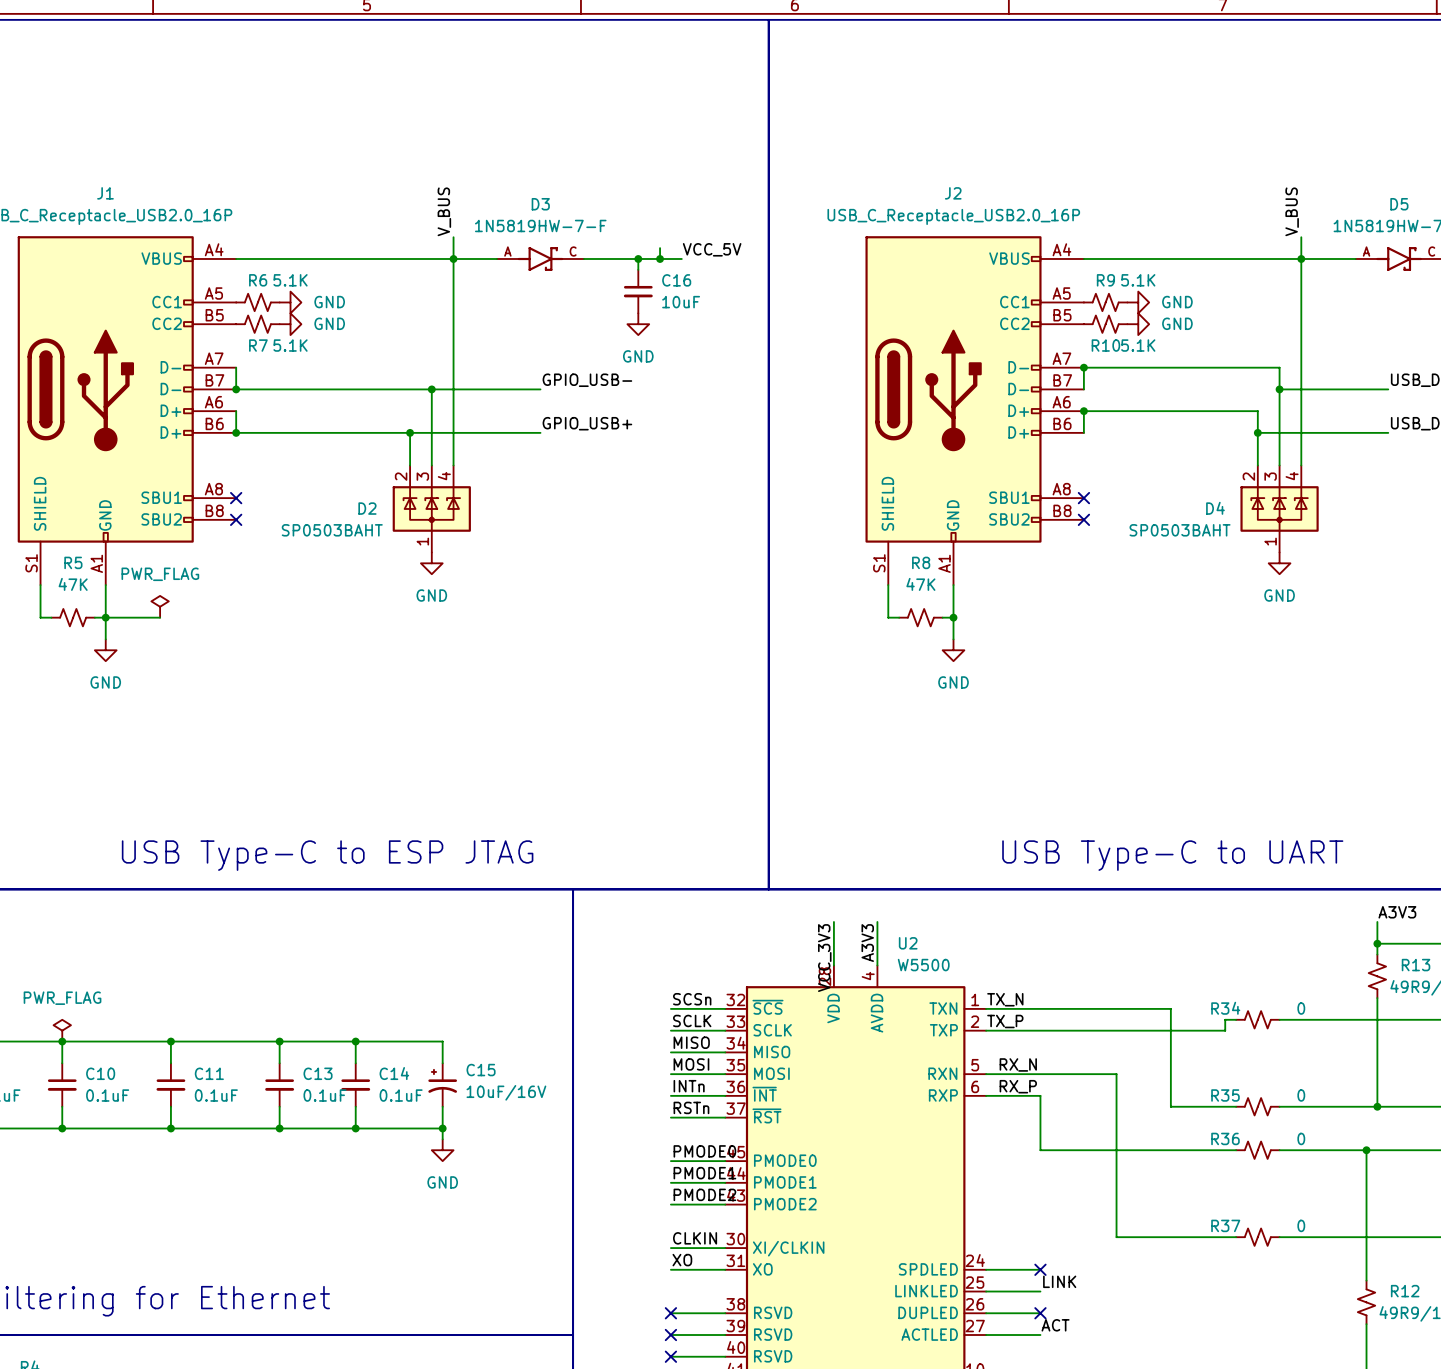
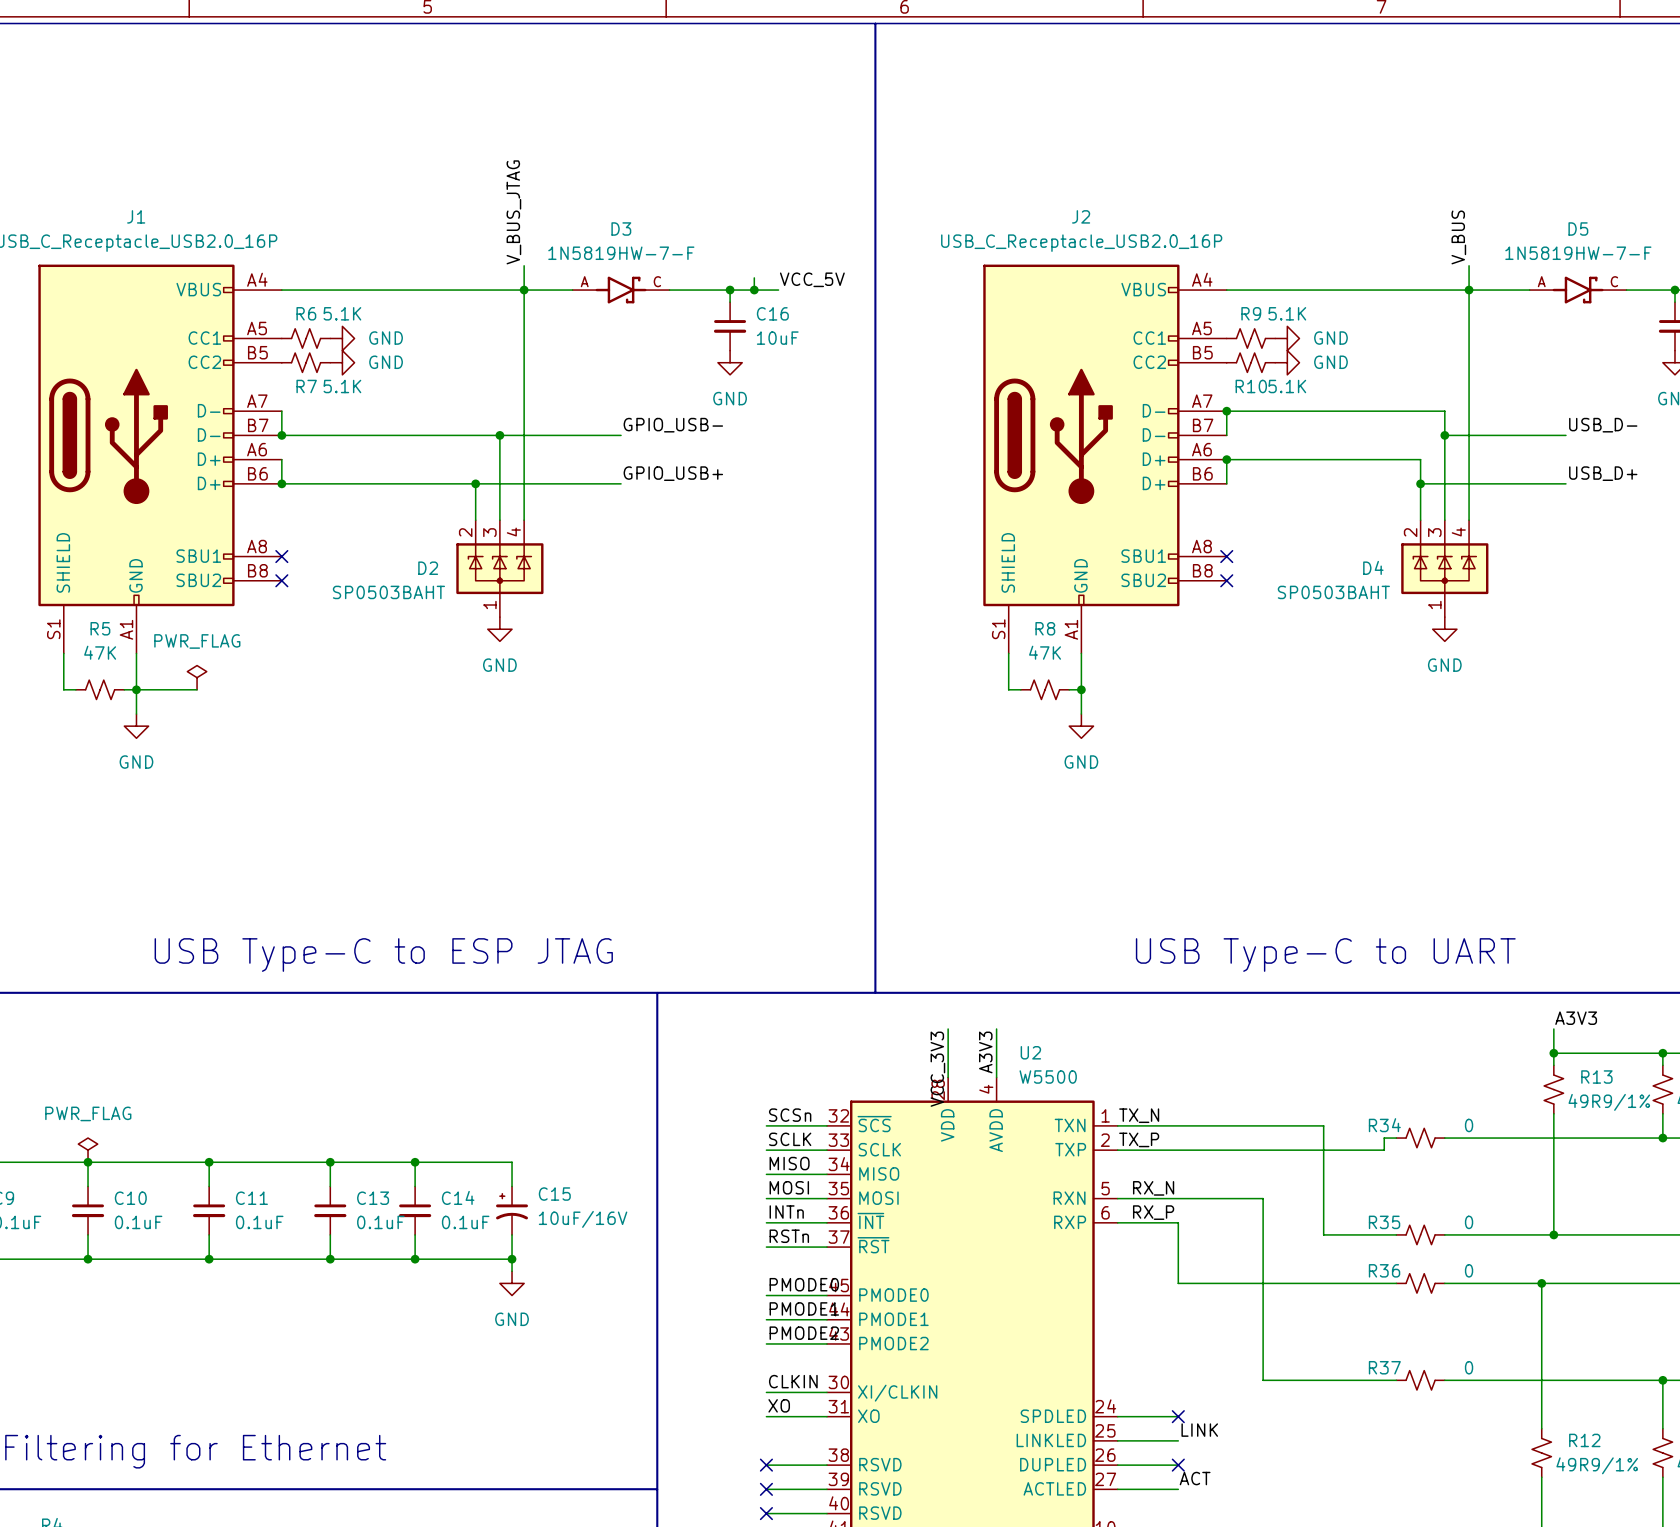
label: V_BUS (444, 211) -> V_BUS_JTAG (513, 212)

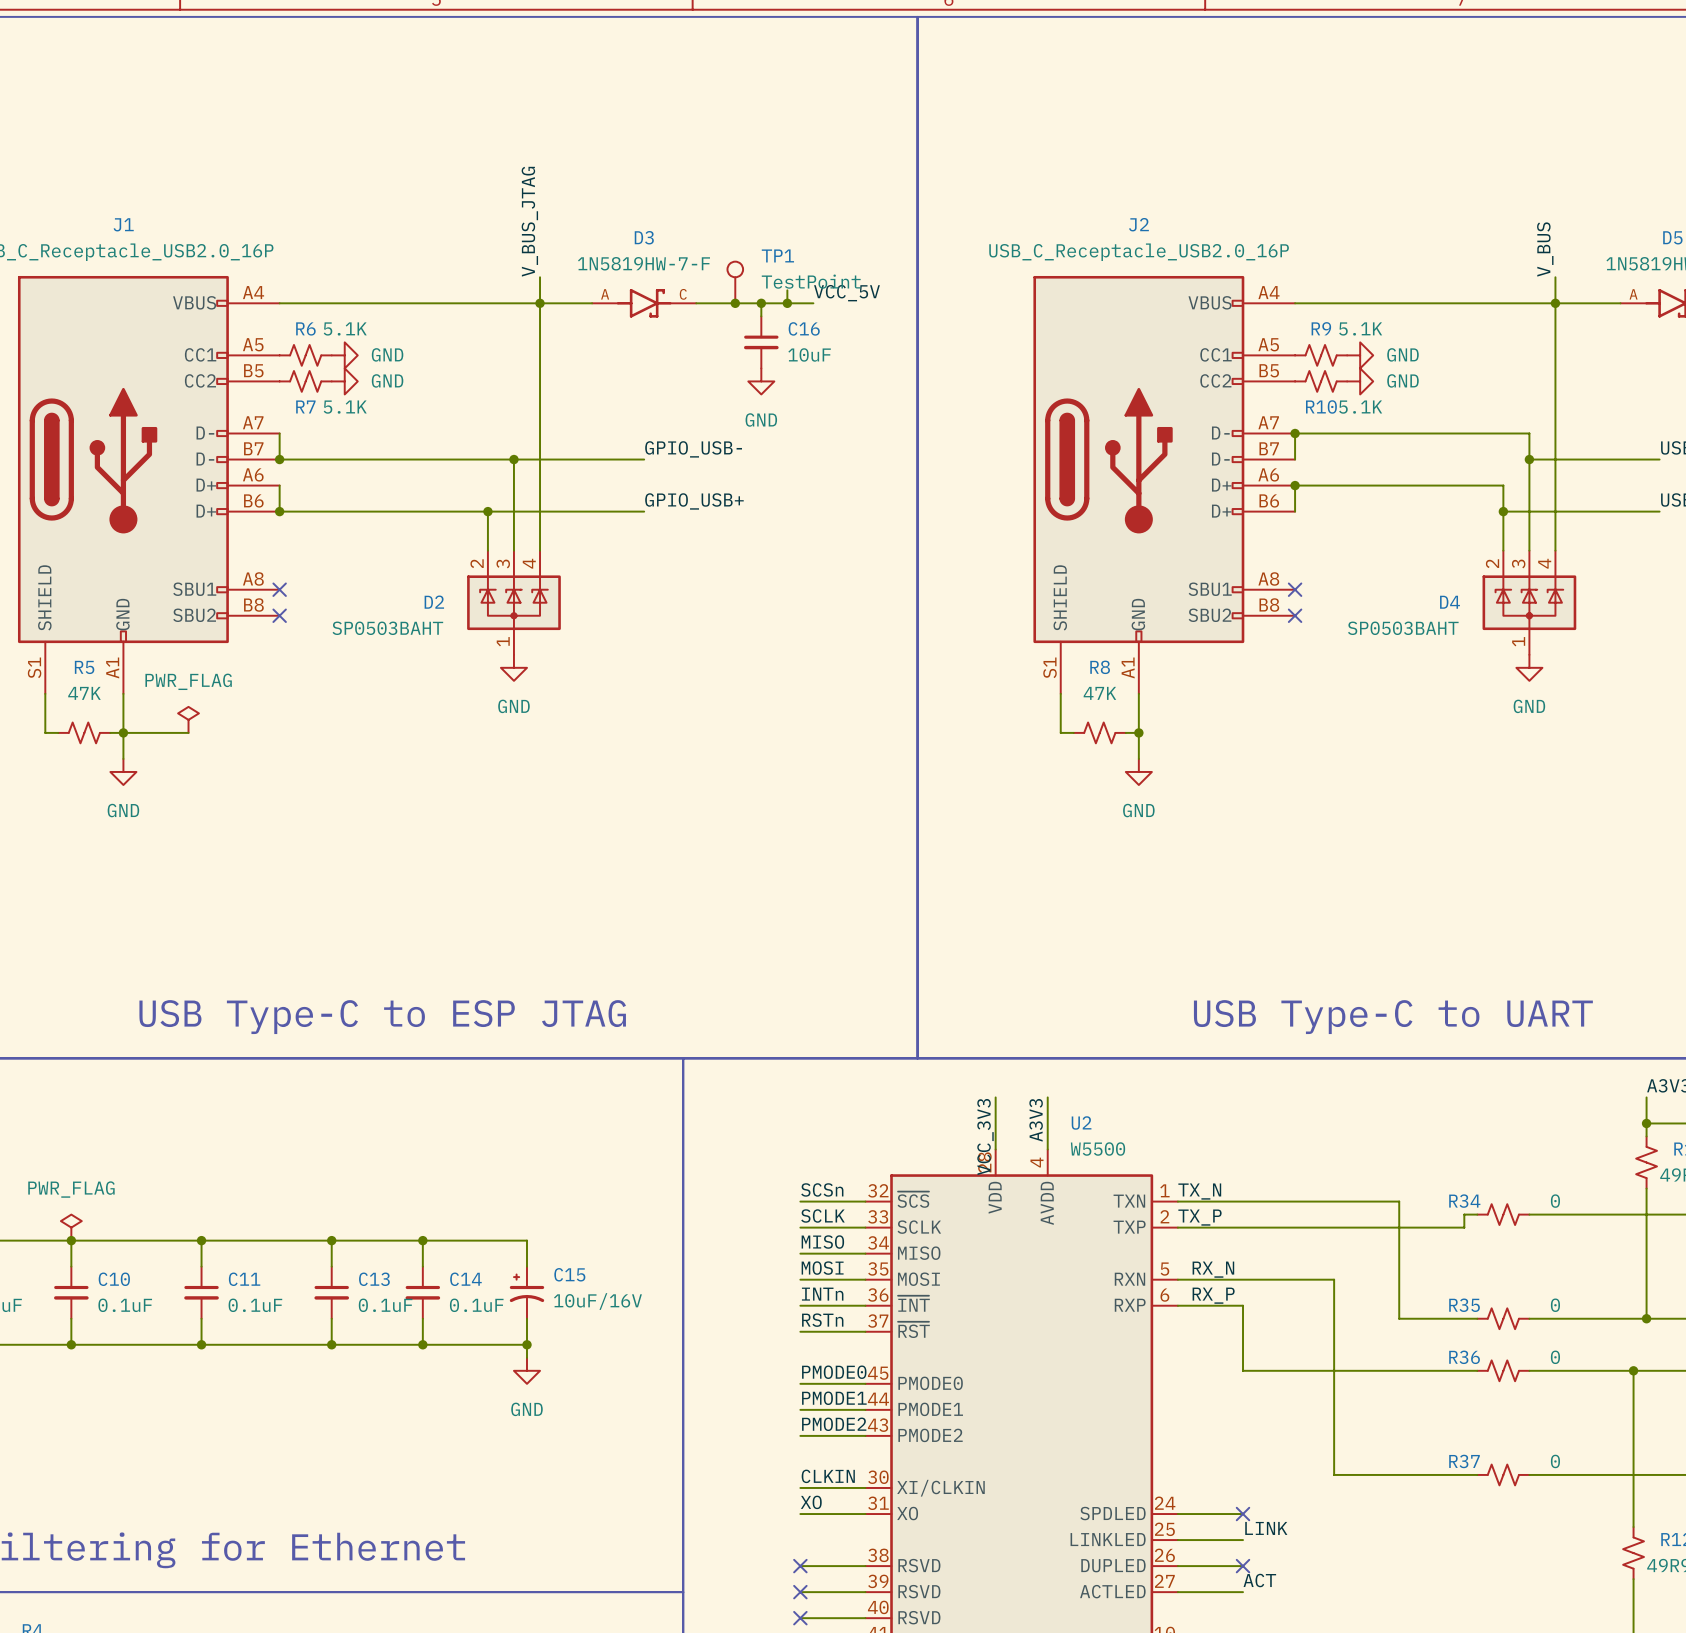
TP1: none -> TestPoint (735, 282)
junction: none -> (735, 303)

